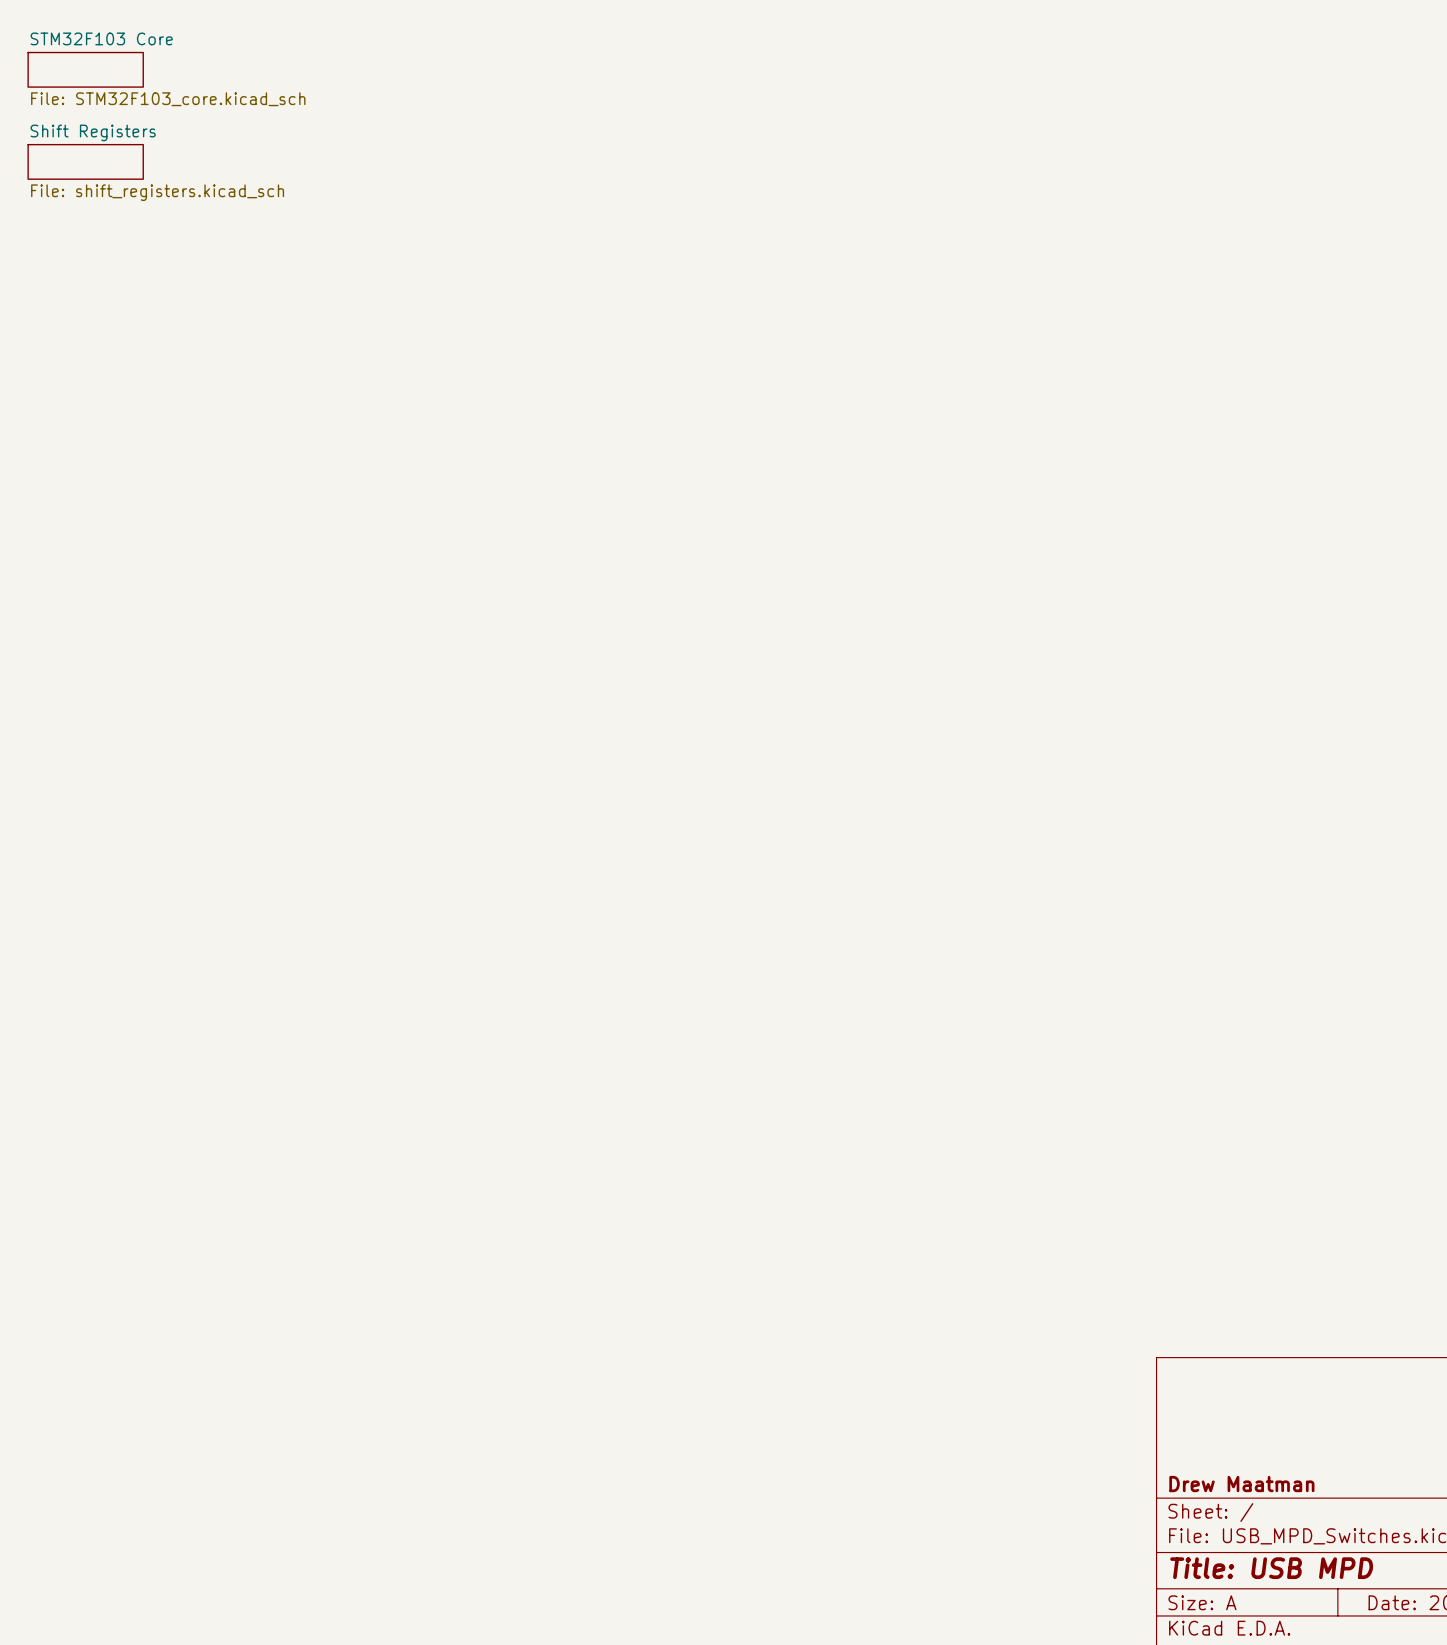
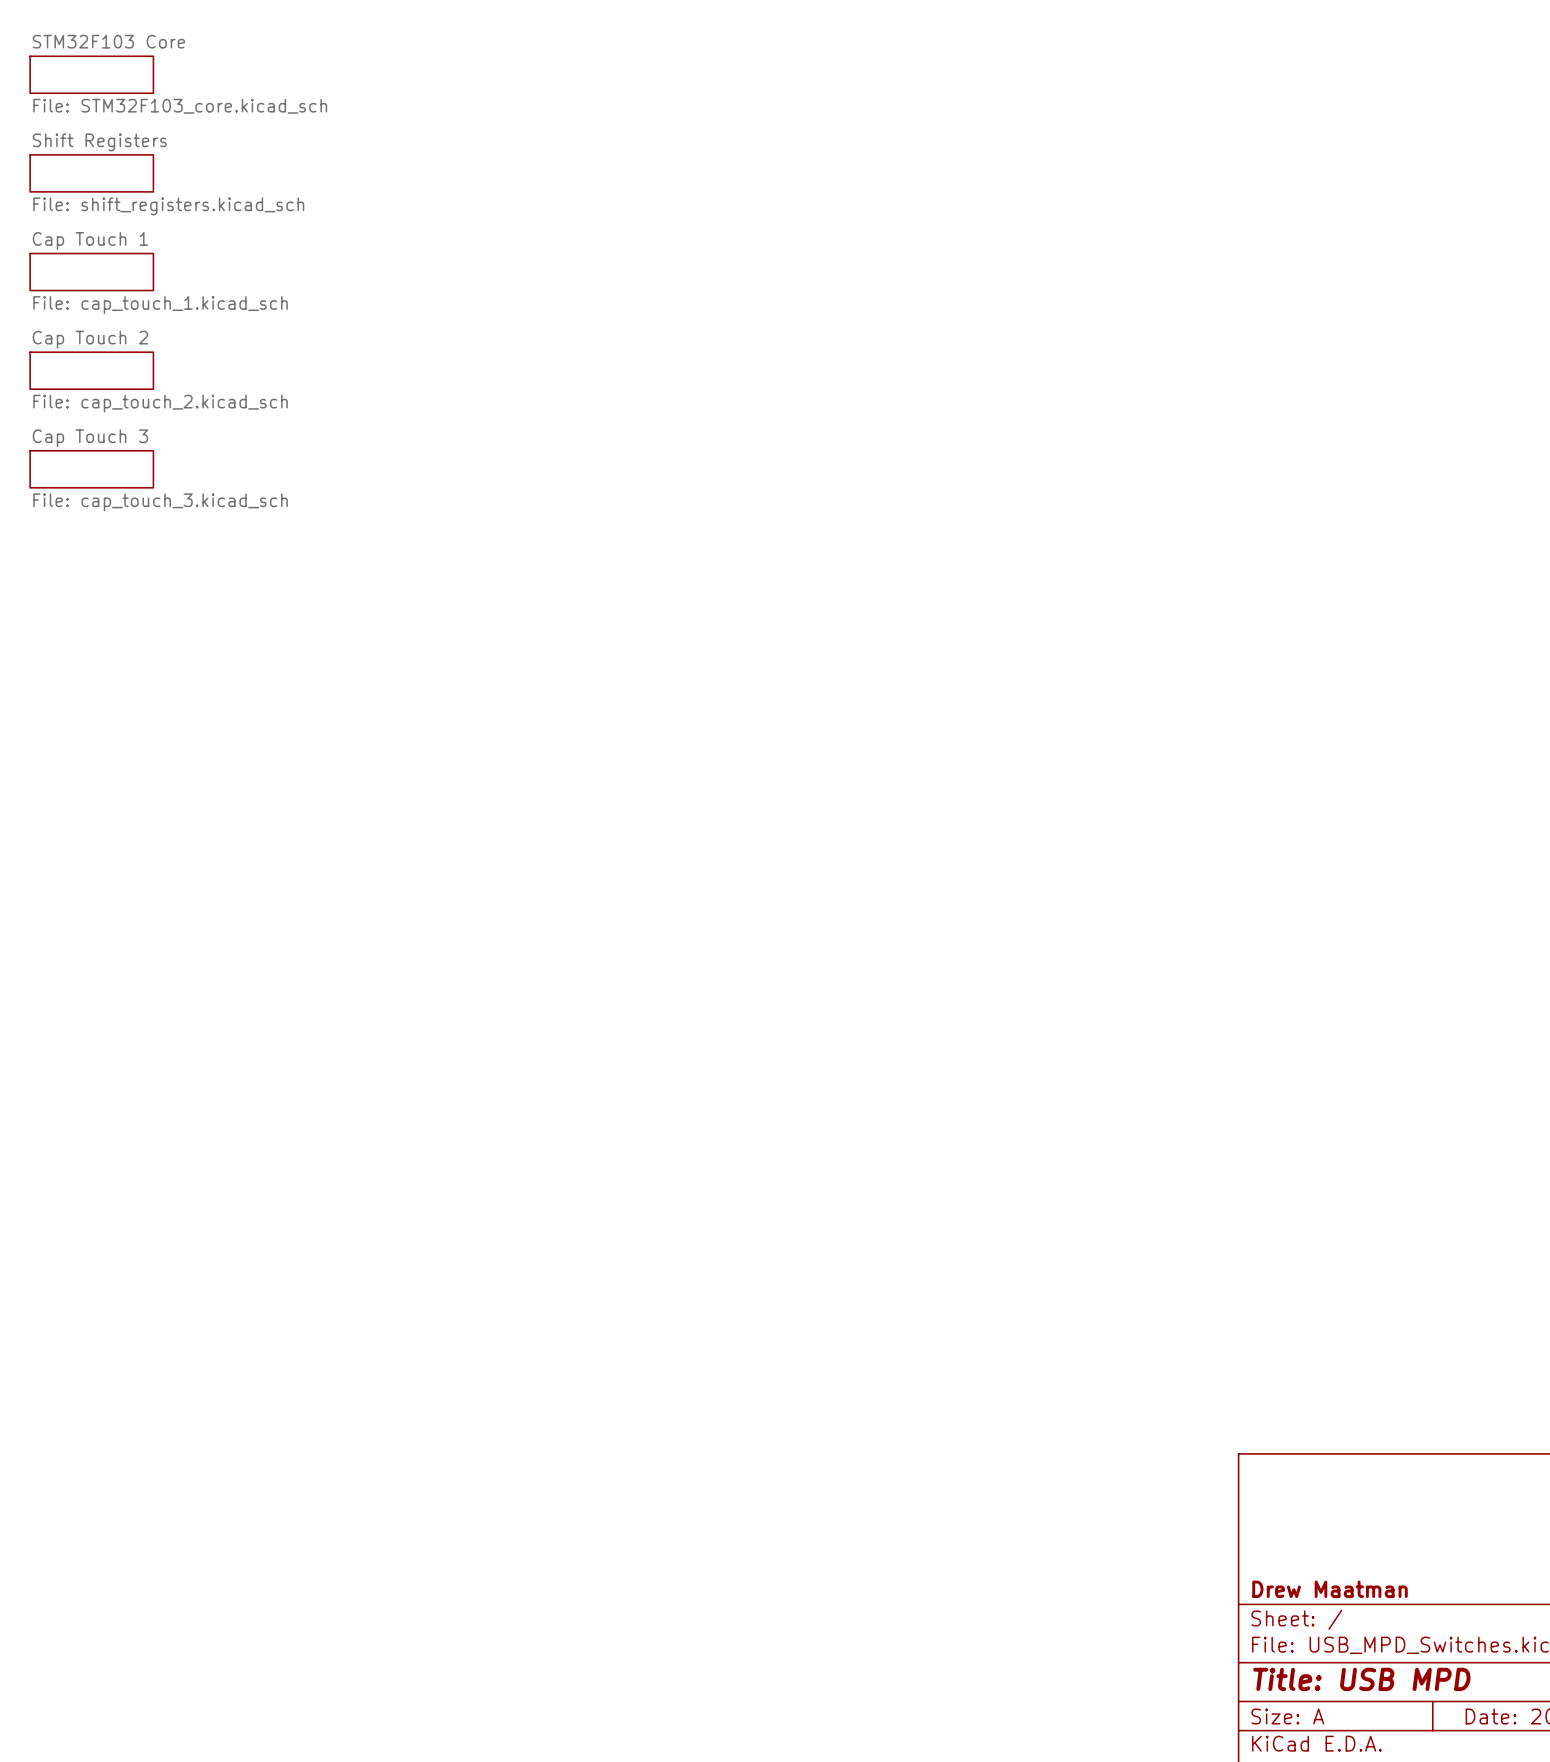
sheet Cap Touch 1: none -> File: cap_touch_1.kicad_sch (91, 272)
sheet Cap Touch 2: none -> File: cap_touch_2.kicad_sch (91, 370)
sheet Cap Touch 3: none -> File: cap_touch_3.kicad_sch (91, 469)

